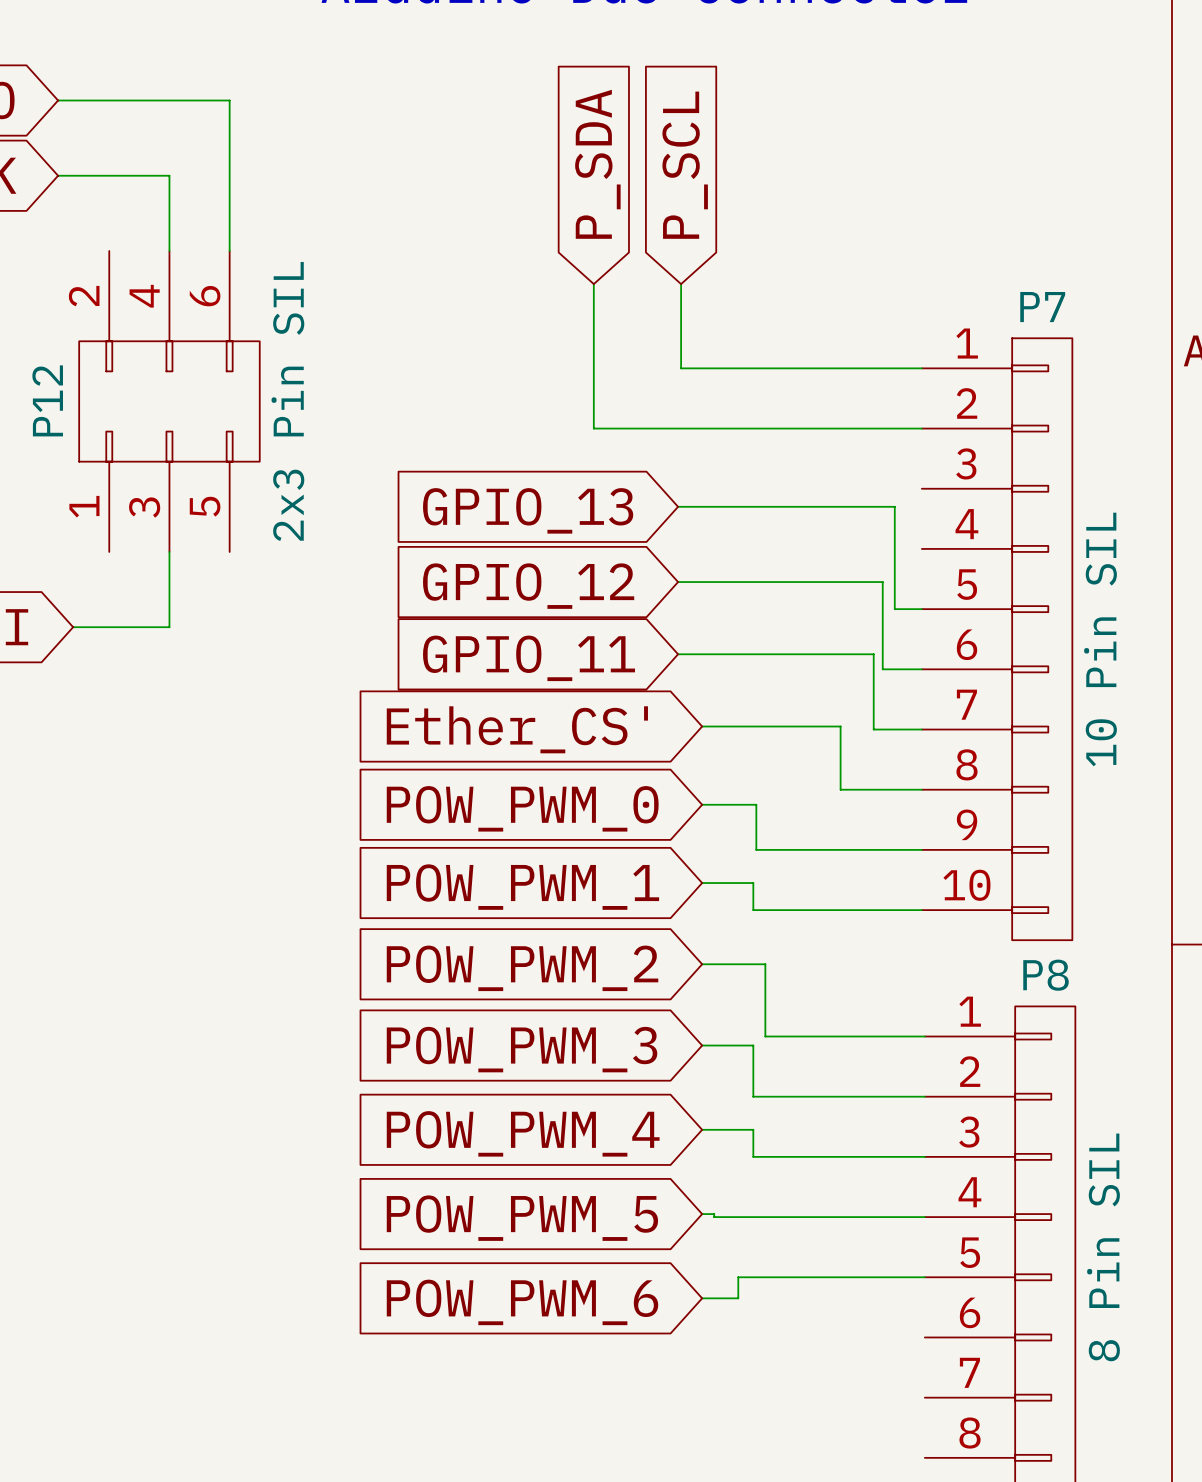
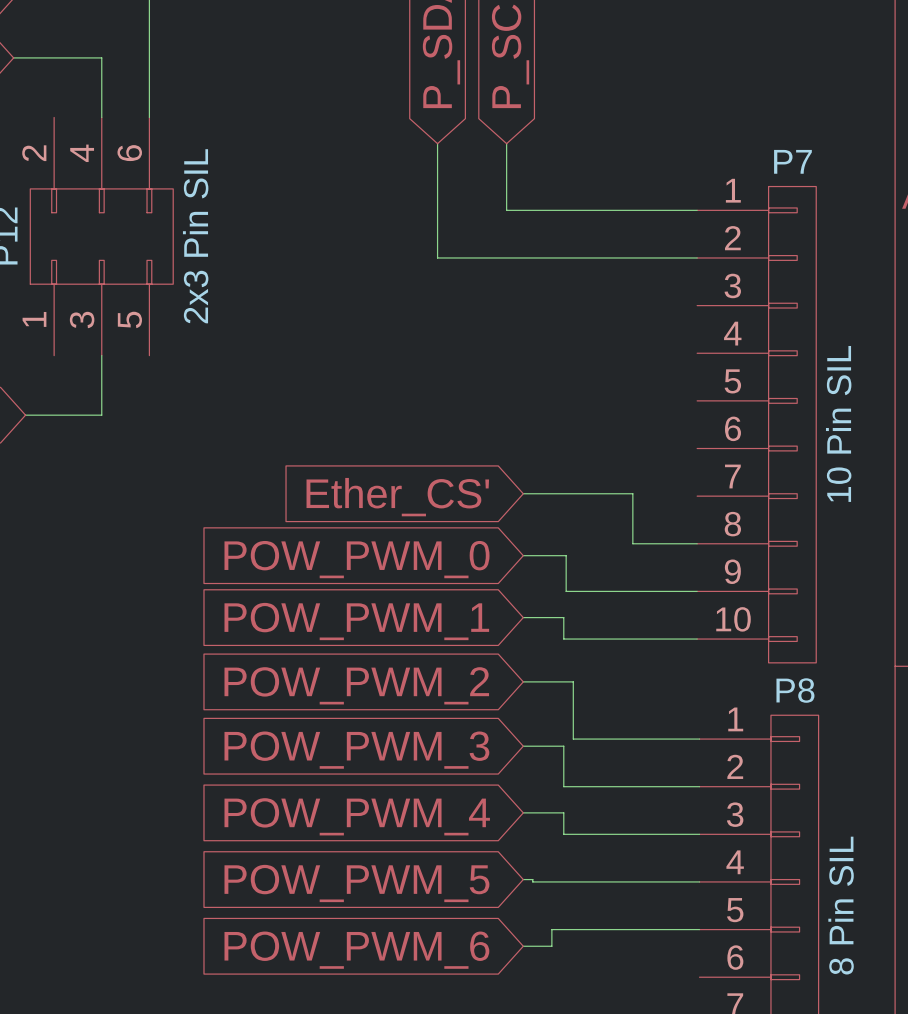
wire: (678, 506) (894, 506) (894, 609) (921, 609) -> none
global label: GPIO_13 (528, 510) -> none
wire: (678, 582) (882, 582) (882, 669) (921, 669) -> none
global label: GPIO_12 (528, 586) -> none
wire: (678, 654) (873, 654) (873, 729) (921, 729) -> none
global label: GPIO_11 (529, 658) -> none

